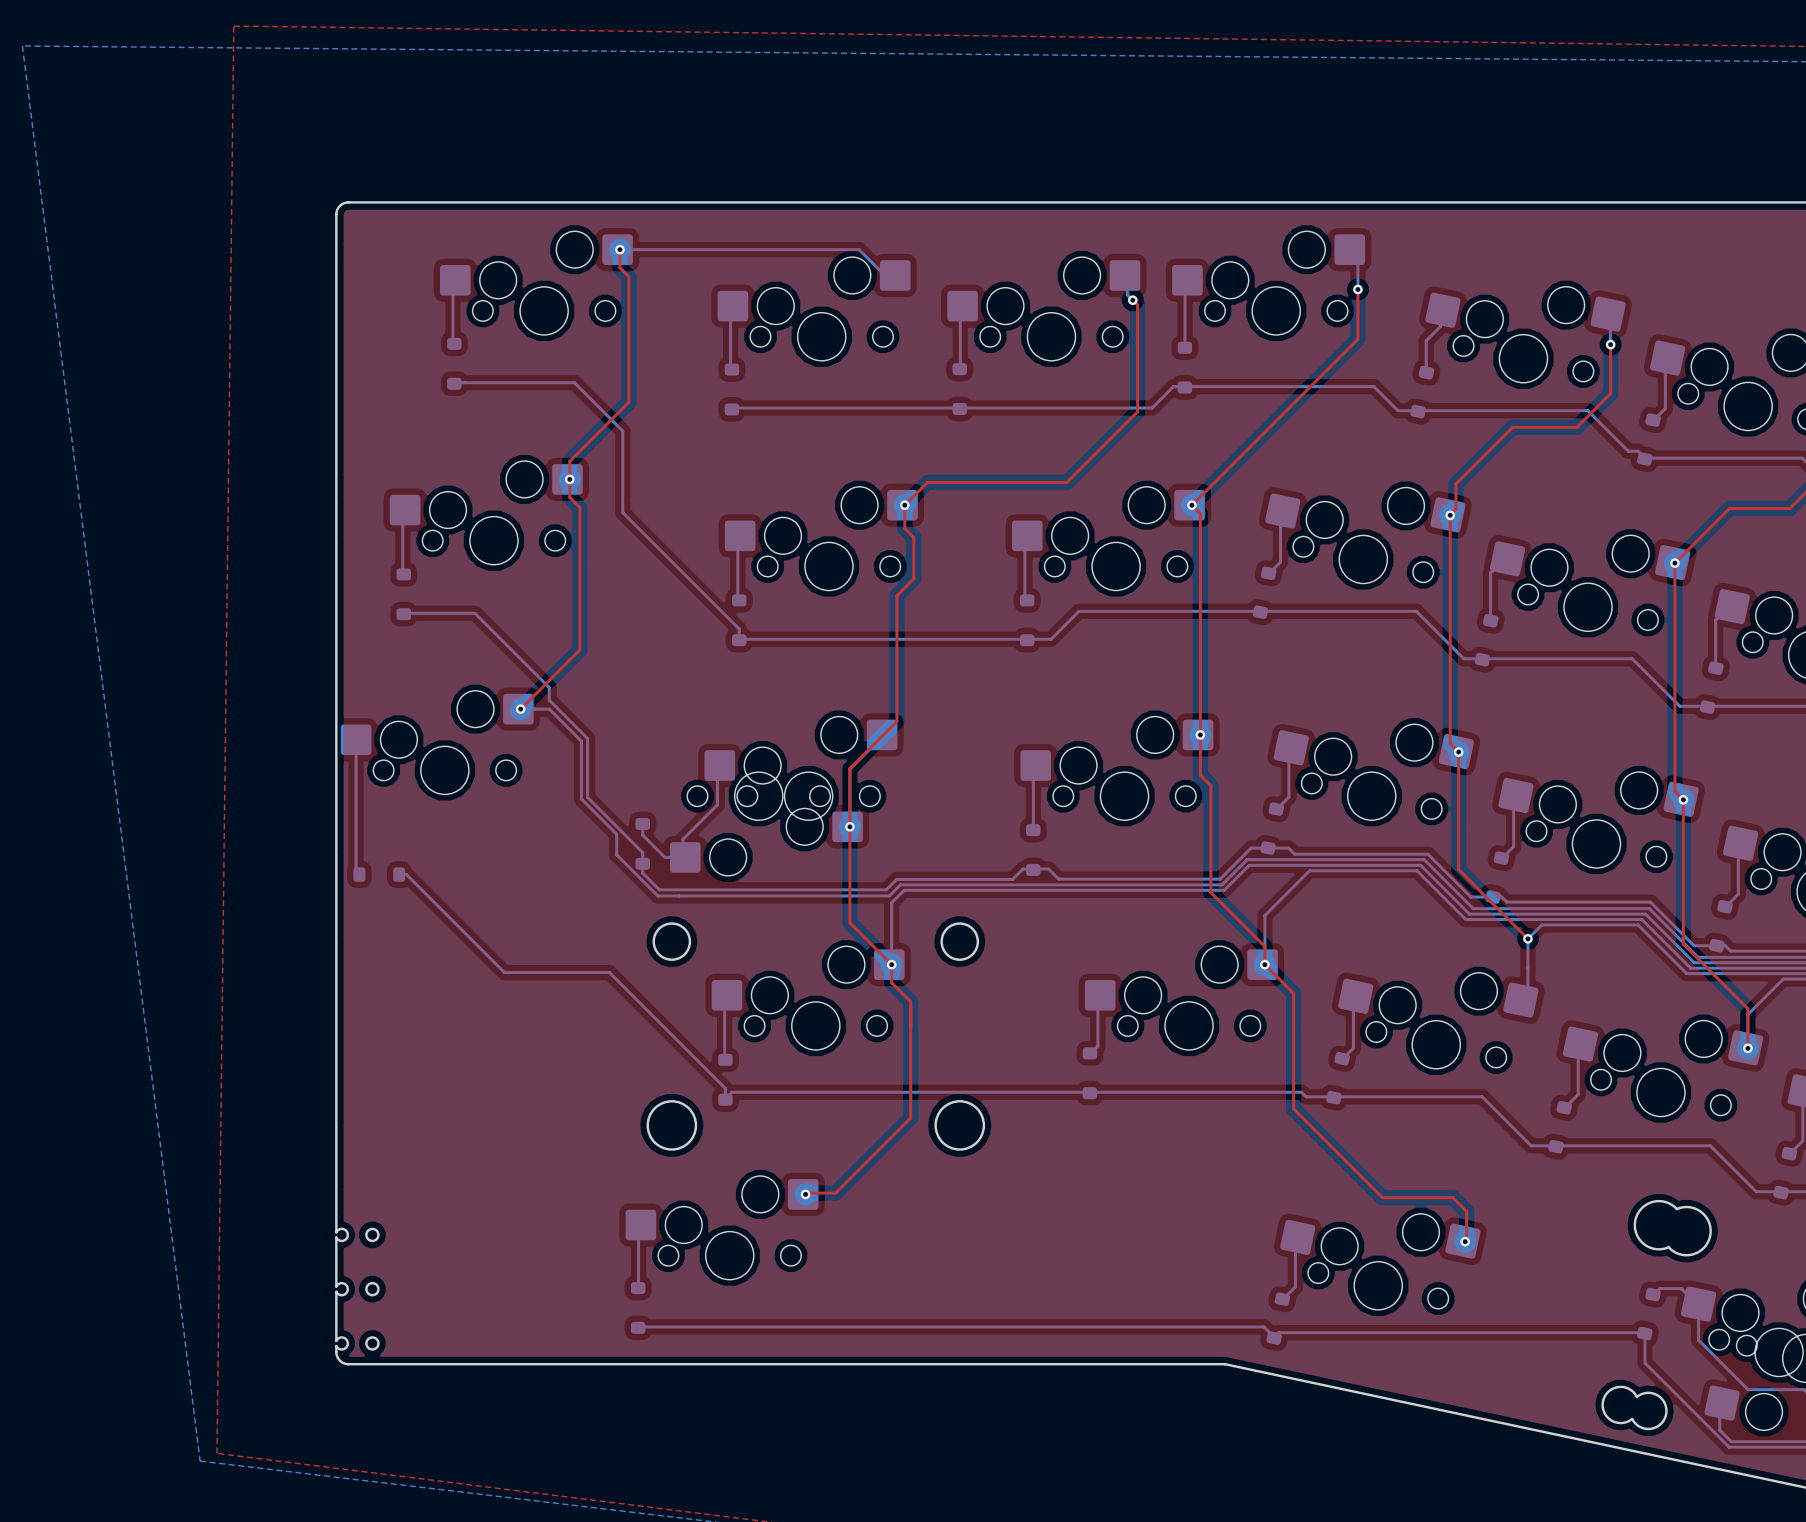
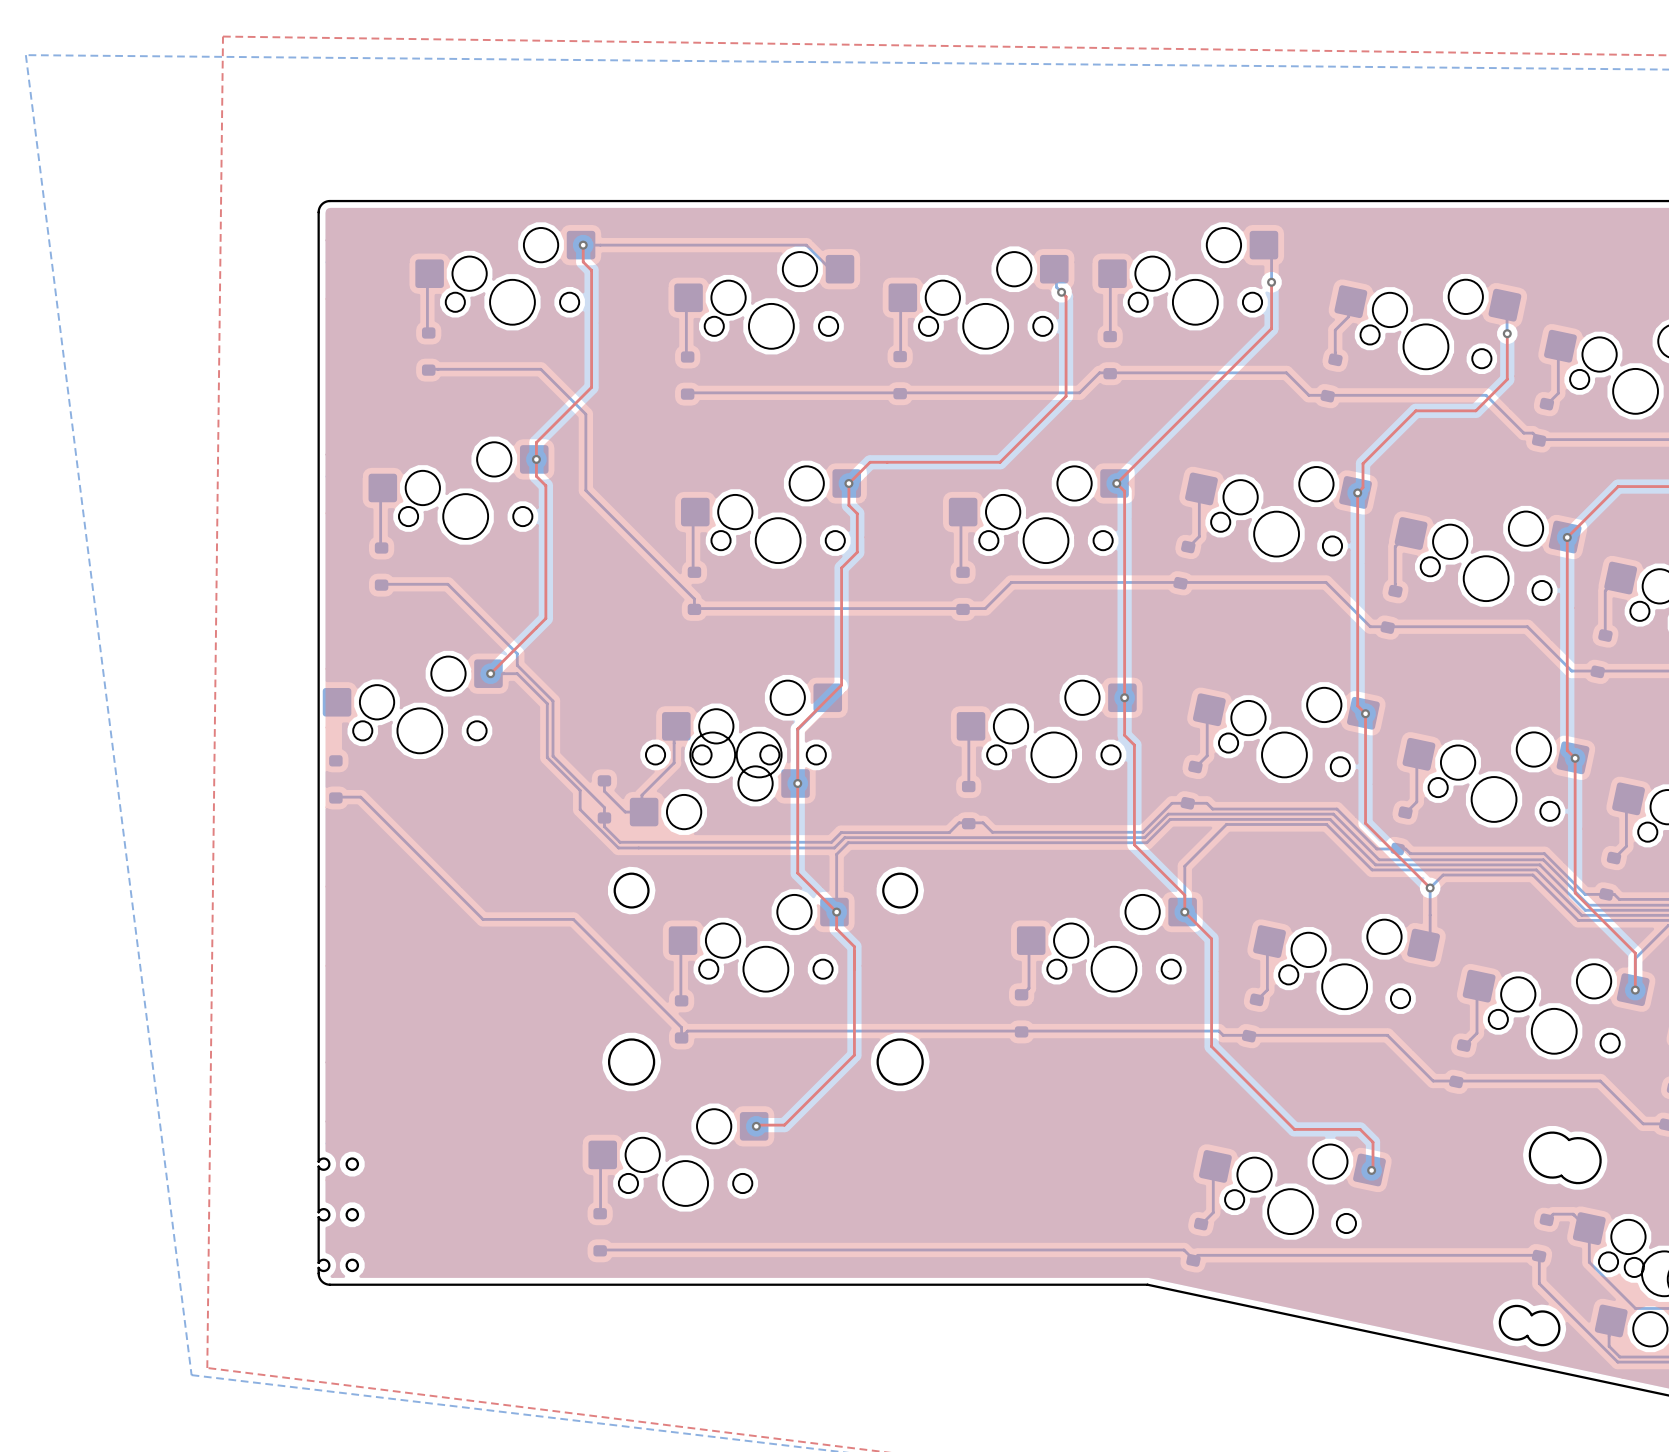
bottom track: (356, 739) (356, 871) (359, 874) -> none
part rotation: 0° (379, 874) -> 90° clockwise (335, 779)
part position: (379, 874) -> (335, 779)
bottom track: (399, 874) (406, 874) (504, 972) (512, 972) -> (335, 797) (360, 797) (483, 919)

